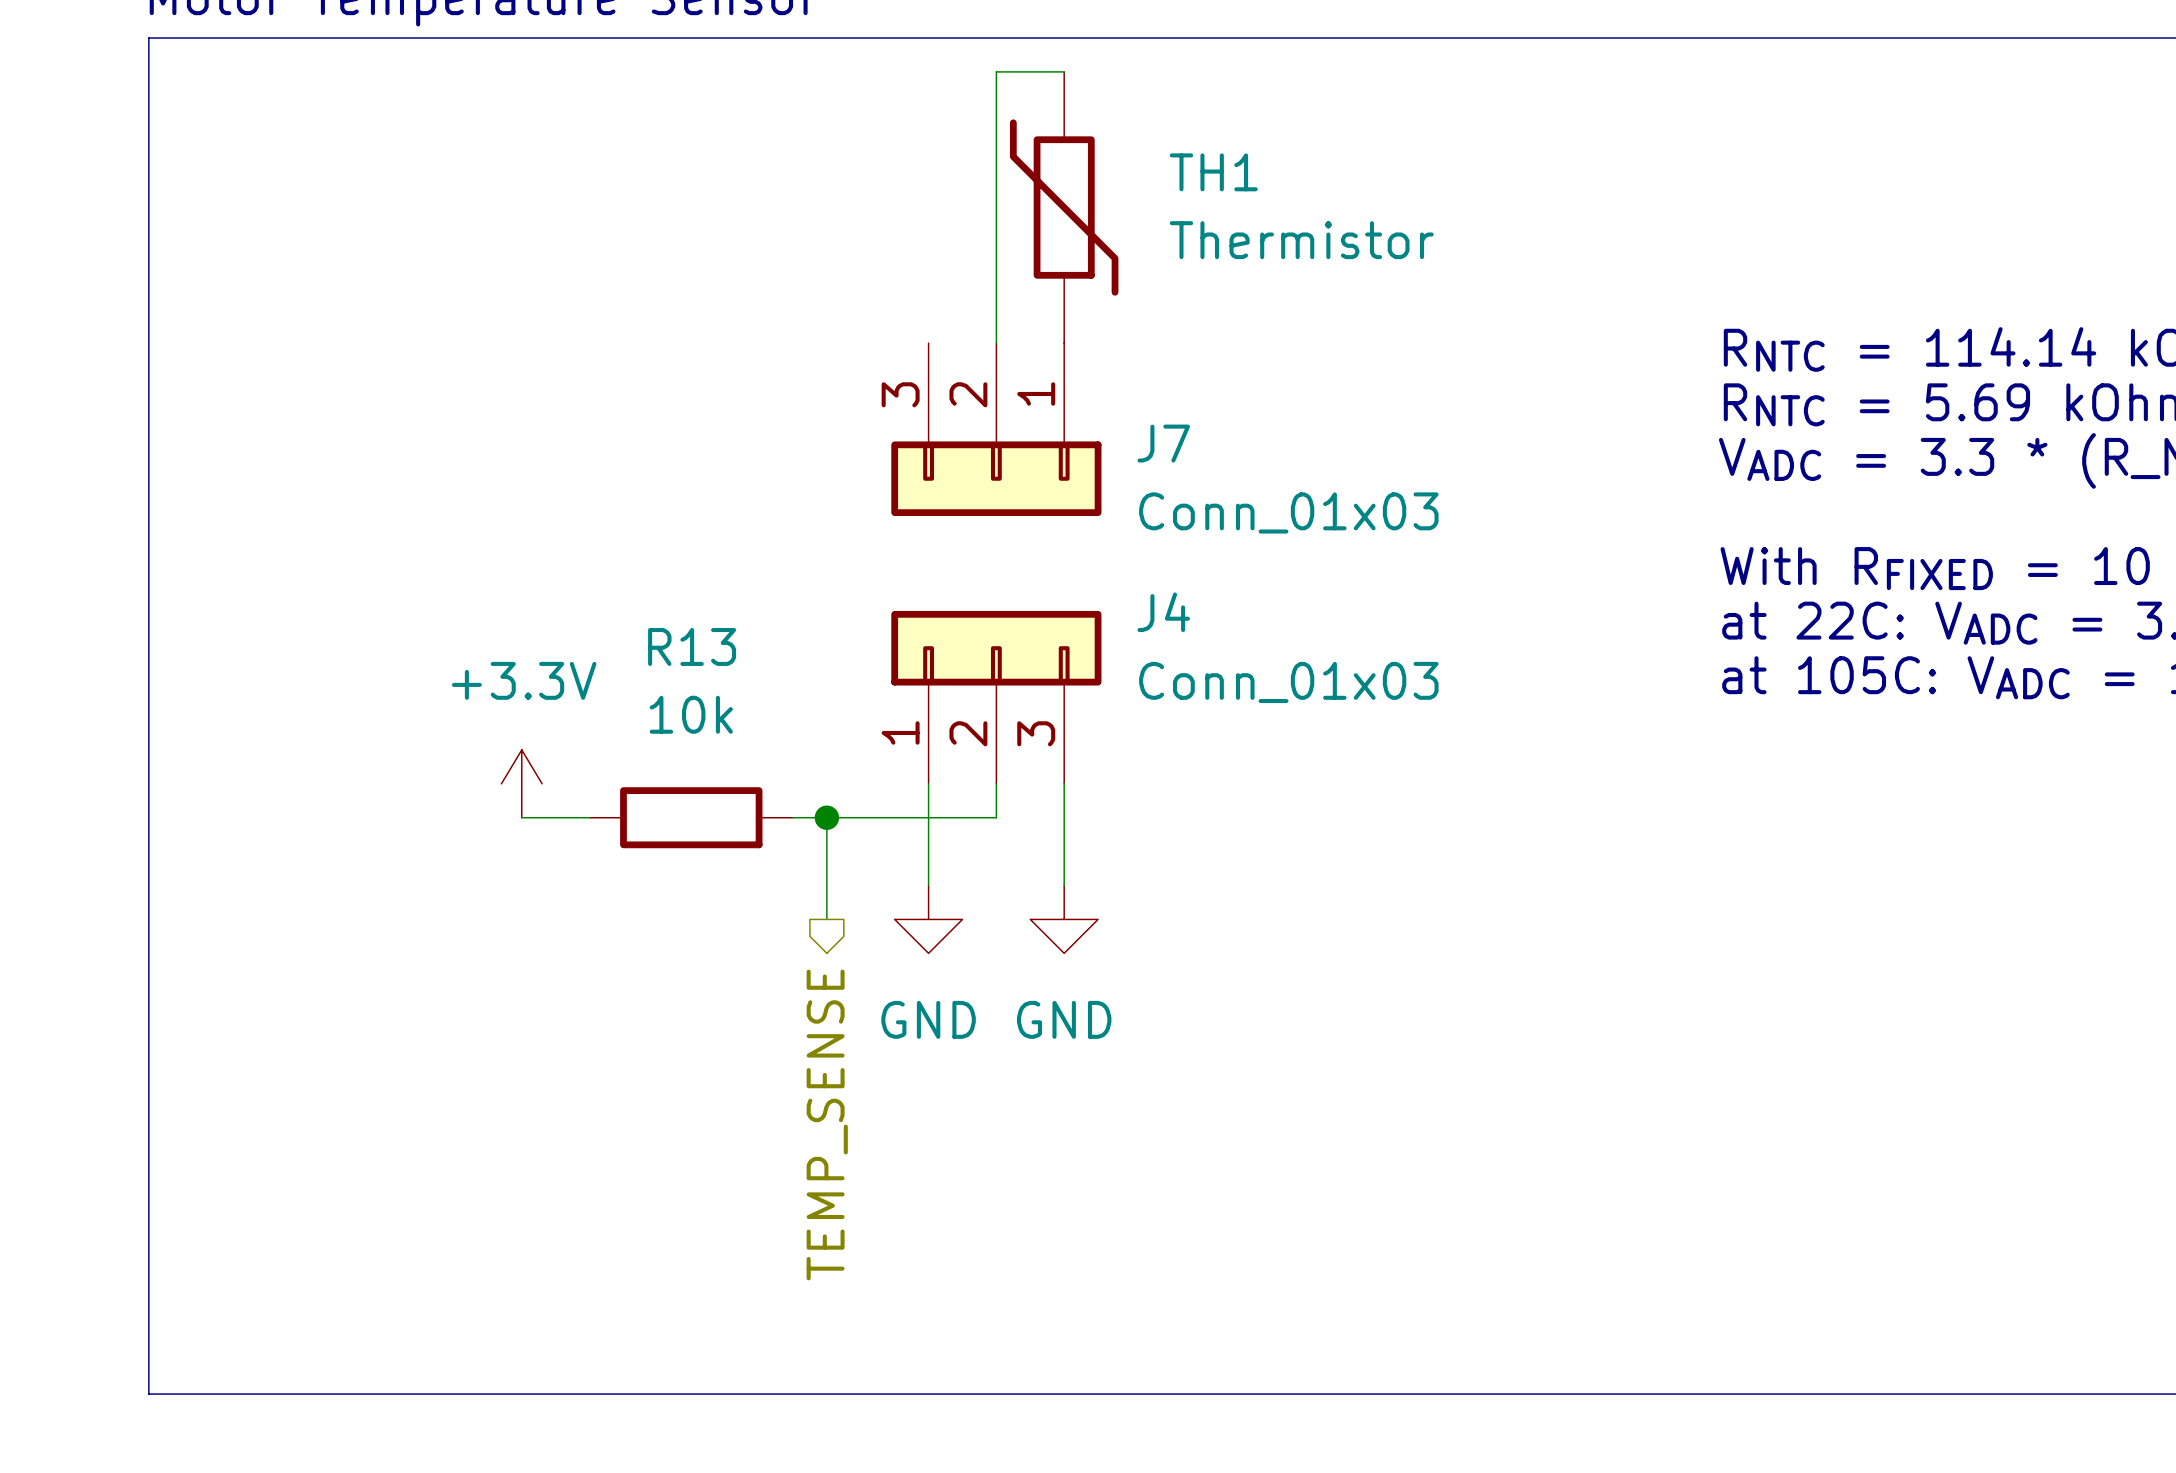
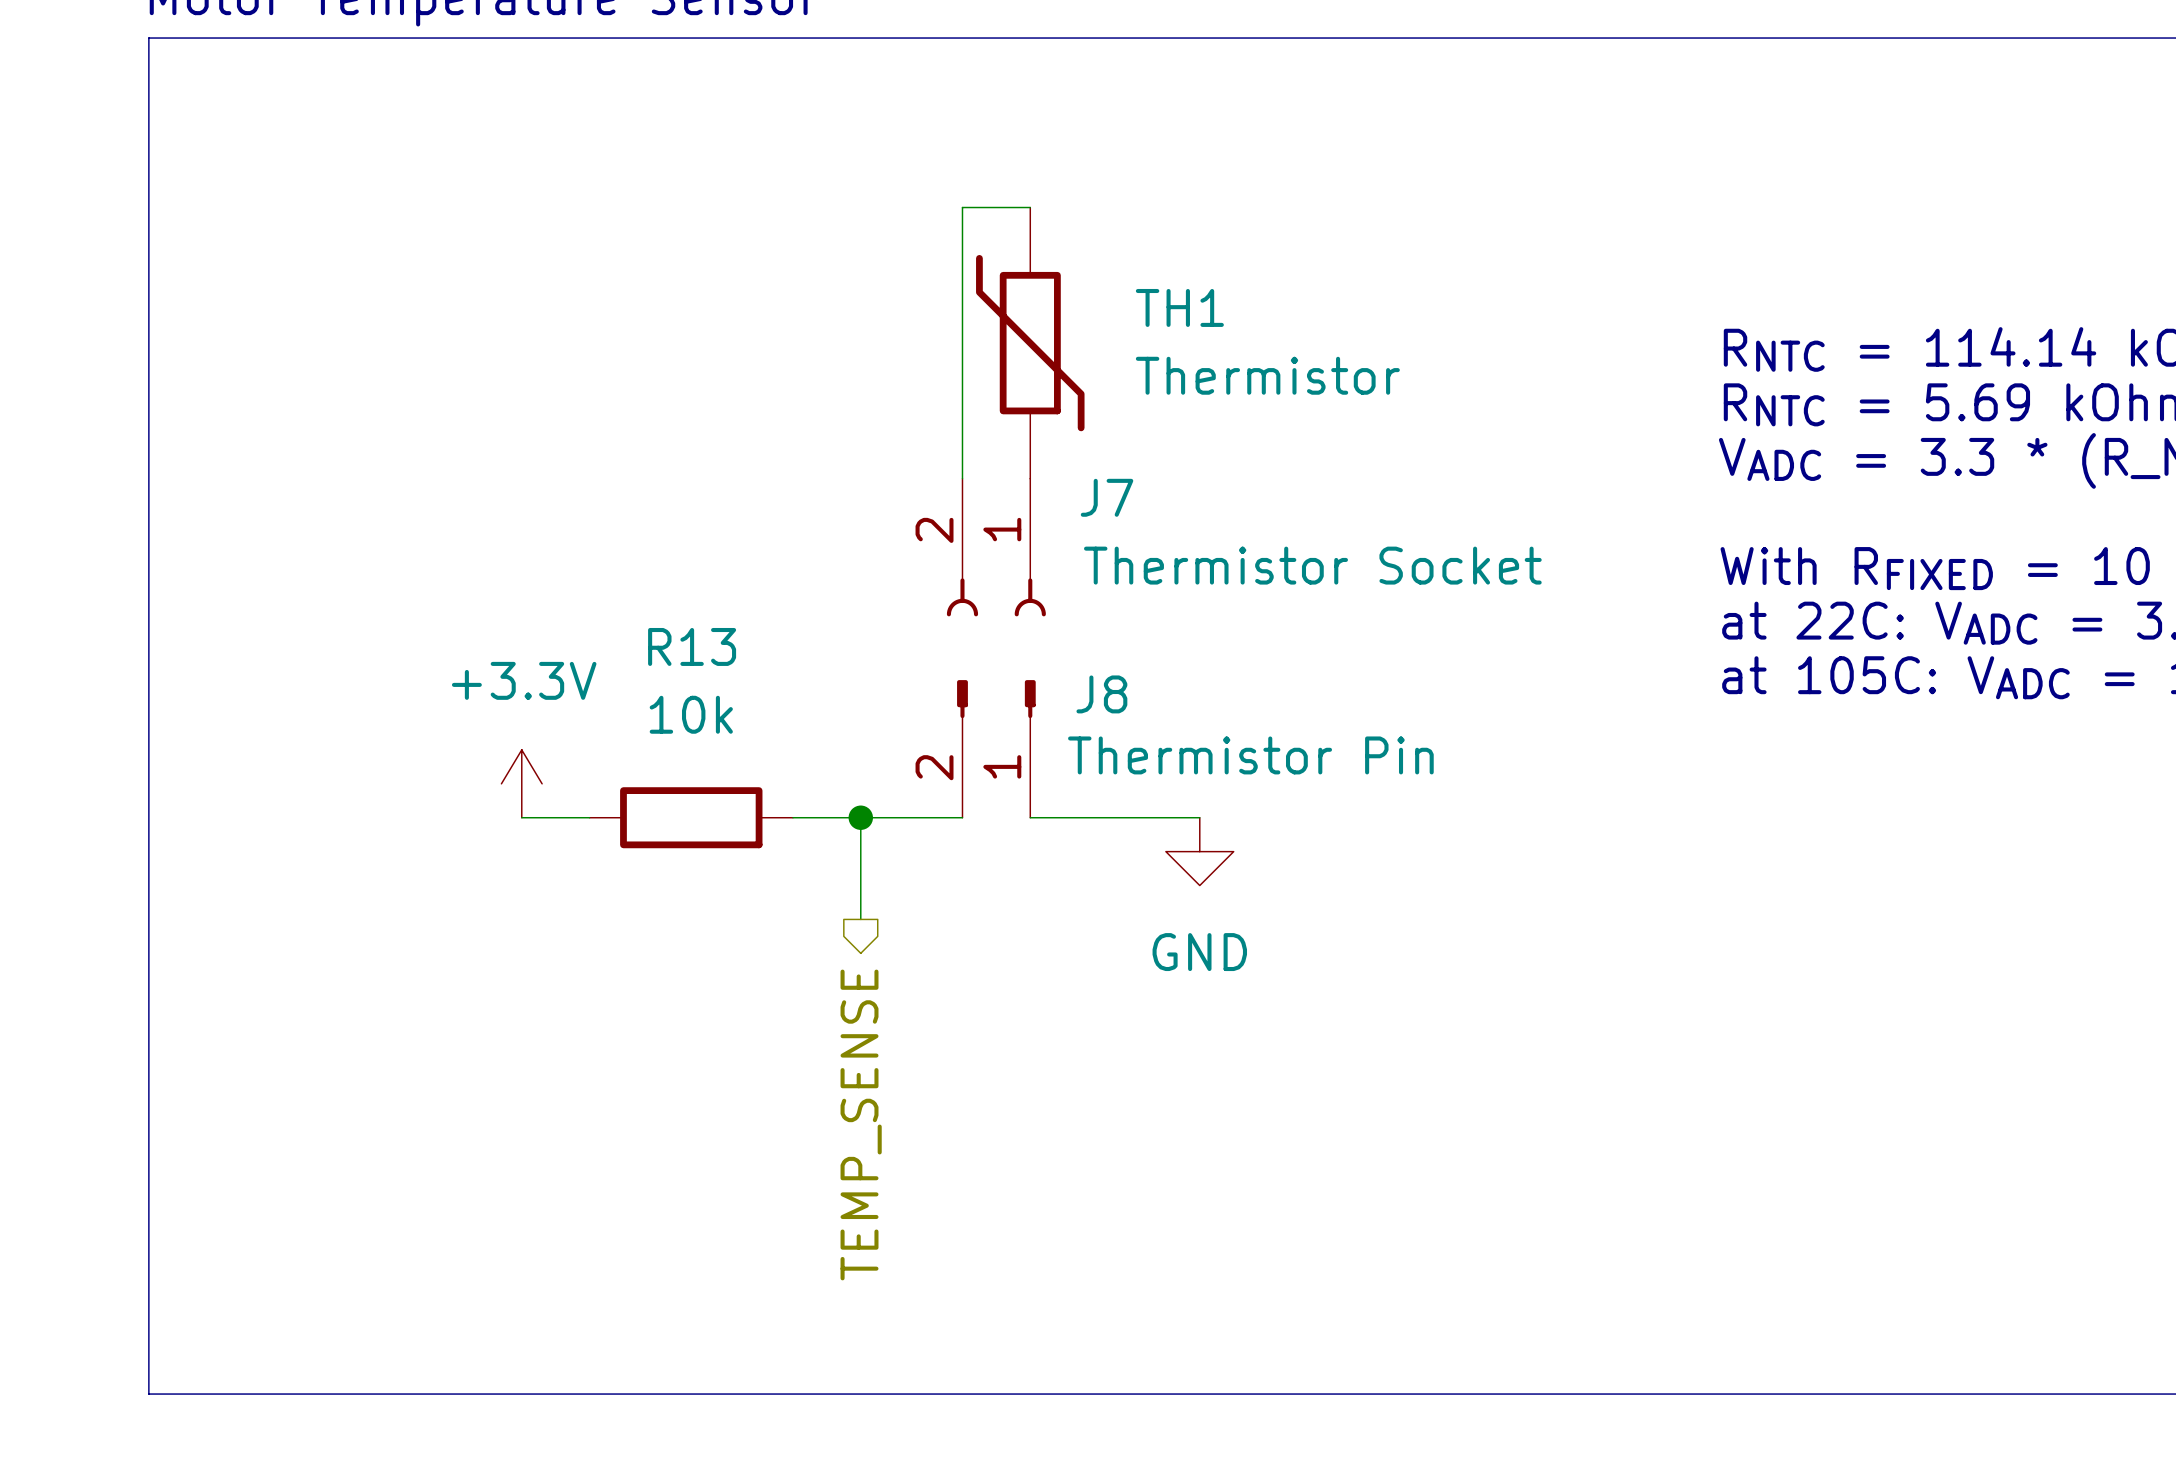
wire: (1064, 71) (996, 71) (996, 343) -> (1030, 207) (962, 207) (962, 478)
TH1 position: (1064, 207) -> (1030, 343)
J7 symbol: [891, 343, 1102, 517] -> [946, 478, 1046, 617]
J7 name position: J7 (1163, 443) -> J7 (1107, 497)
J7 value: Conn_01x03 (1288, 512) -> Thermistor Socket (1312, 565)
J4: Conn_01x03 (996, 697) -> none
J8: none -> Thermistor Pin (996, 748)
wire: (928, 783) (928, 885) -> none
wire: (996, 783) (996, 817) (962, 817) -> none
wire: (1064, 783) (1064, 885) -> none
wire: (826, 817) (826, 919) -> (860, 817) (860, 919)
junction position: (826, 817) -> (860, 817)
wire: none -> (1030, 817) (1199, 817)
power symbol: none -> GND (1199, 851)
power symbol: GND (928, 919) -> none
power symbol: GND (1064, 919) -> none
hierarchical label position: TEMP_SENSE (827, 1124) -> TEMP_SENSE (861, 1124)

